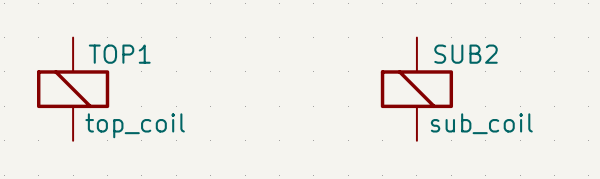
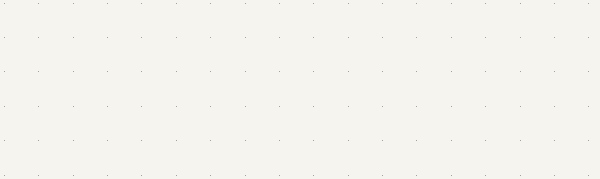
TOP1: top_coil (73, 89) -> none
SUB2: sub_coil (416, 89) -> none

